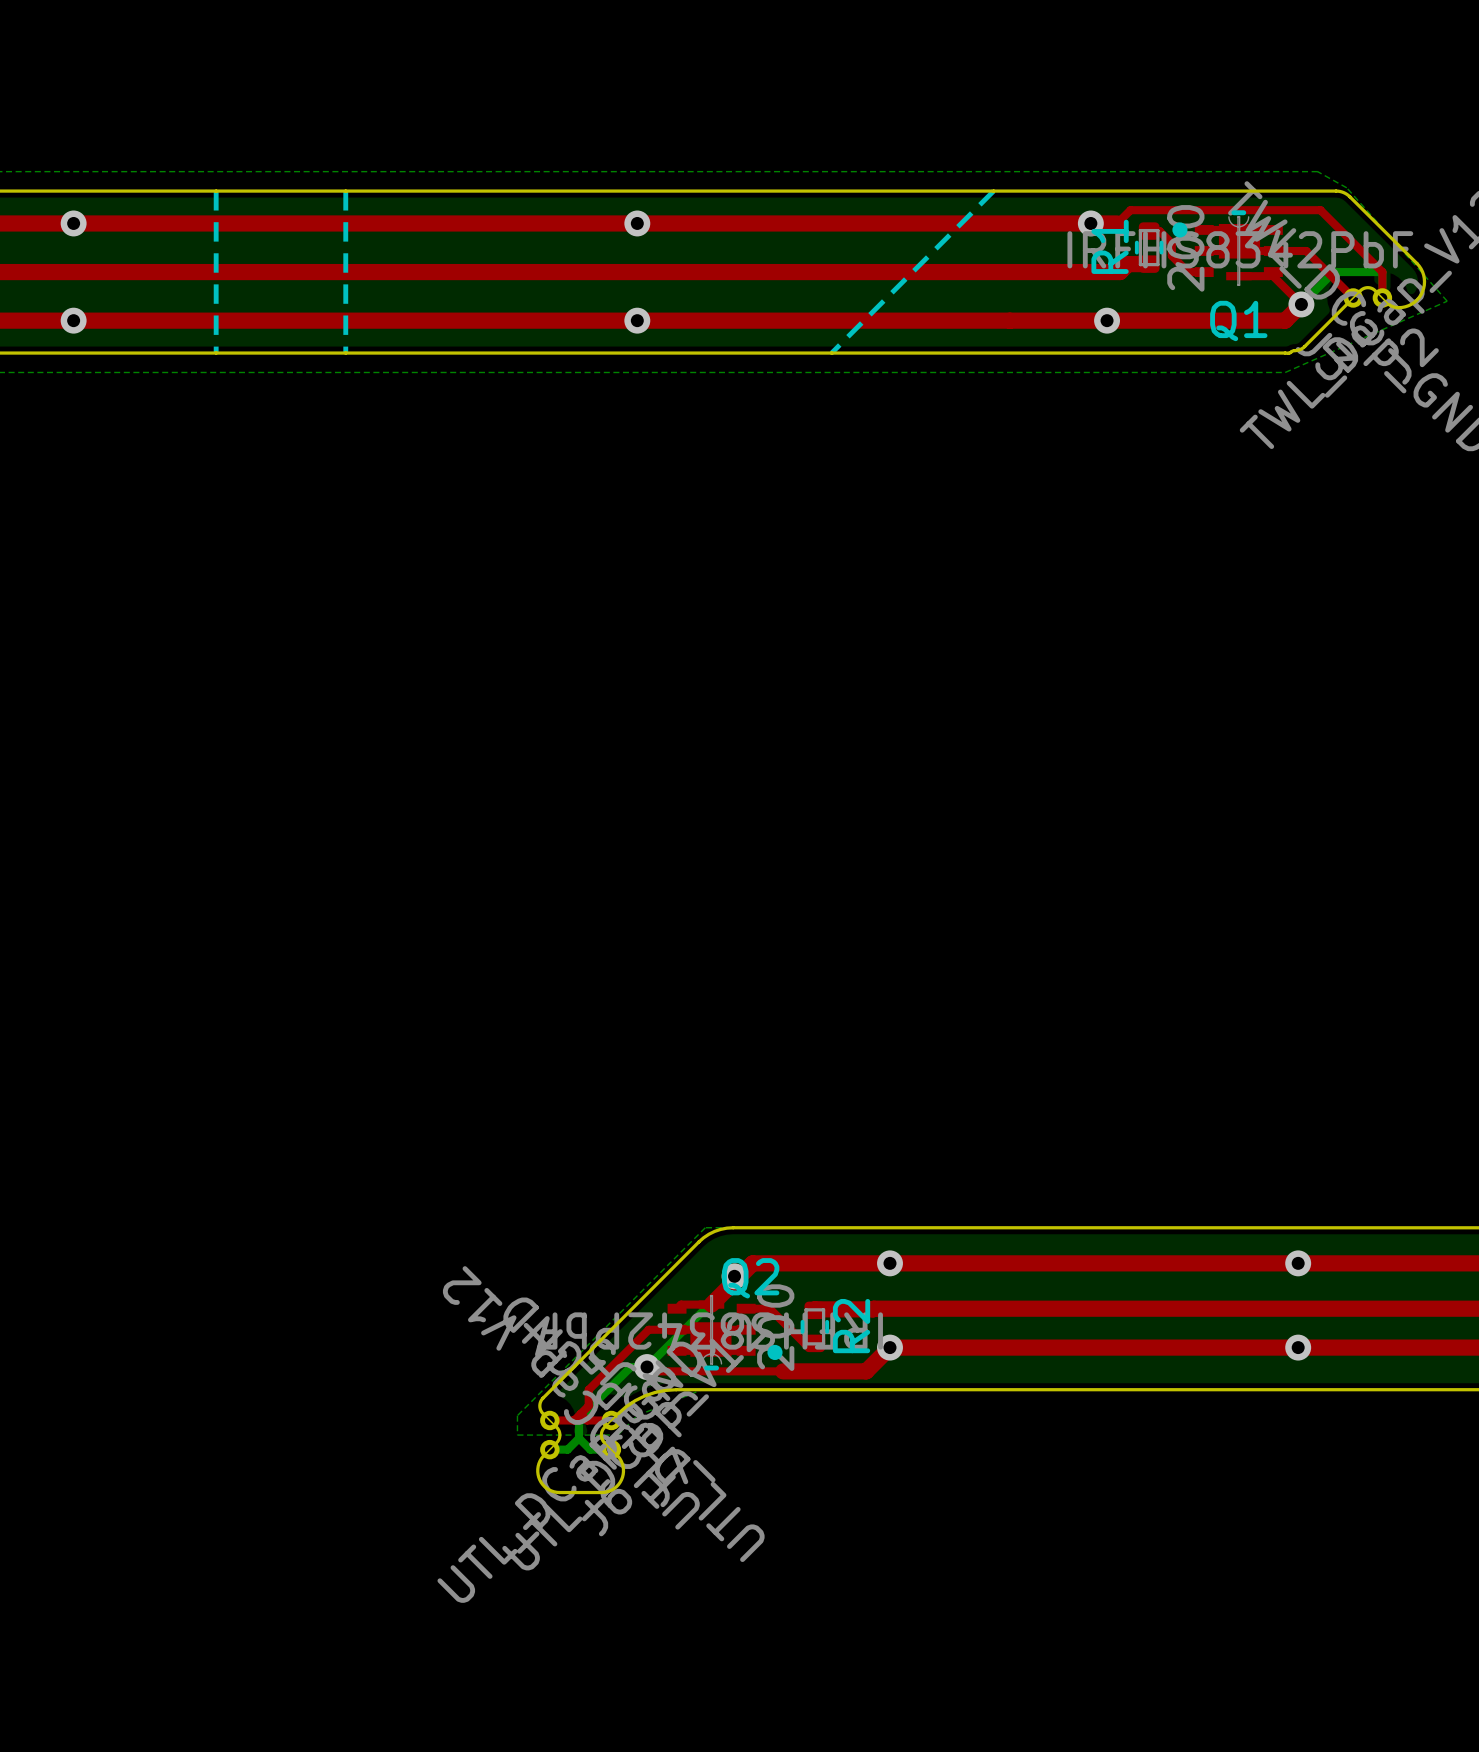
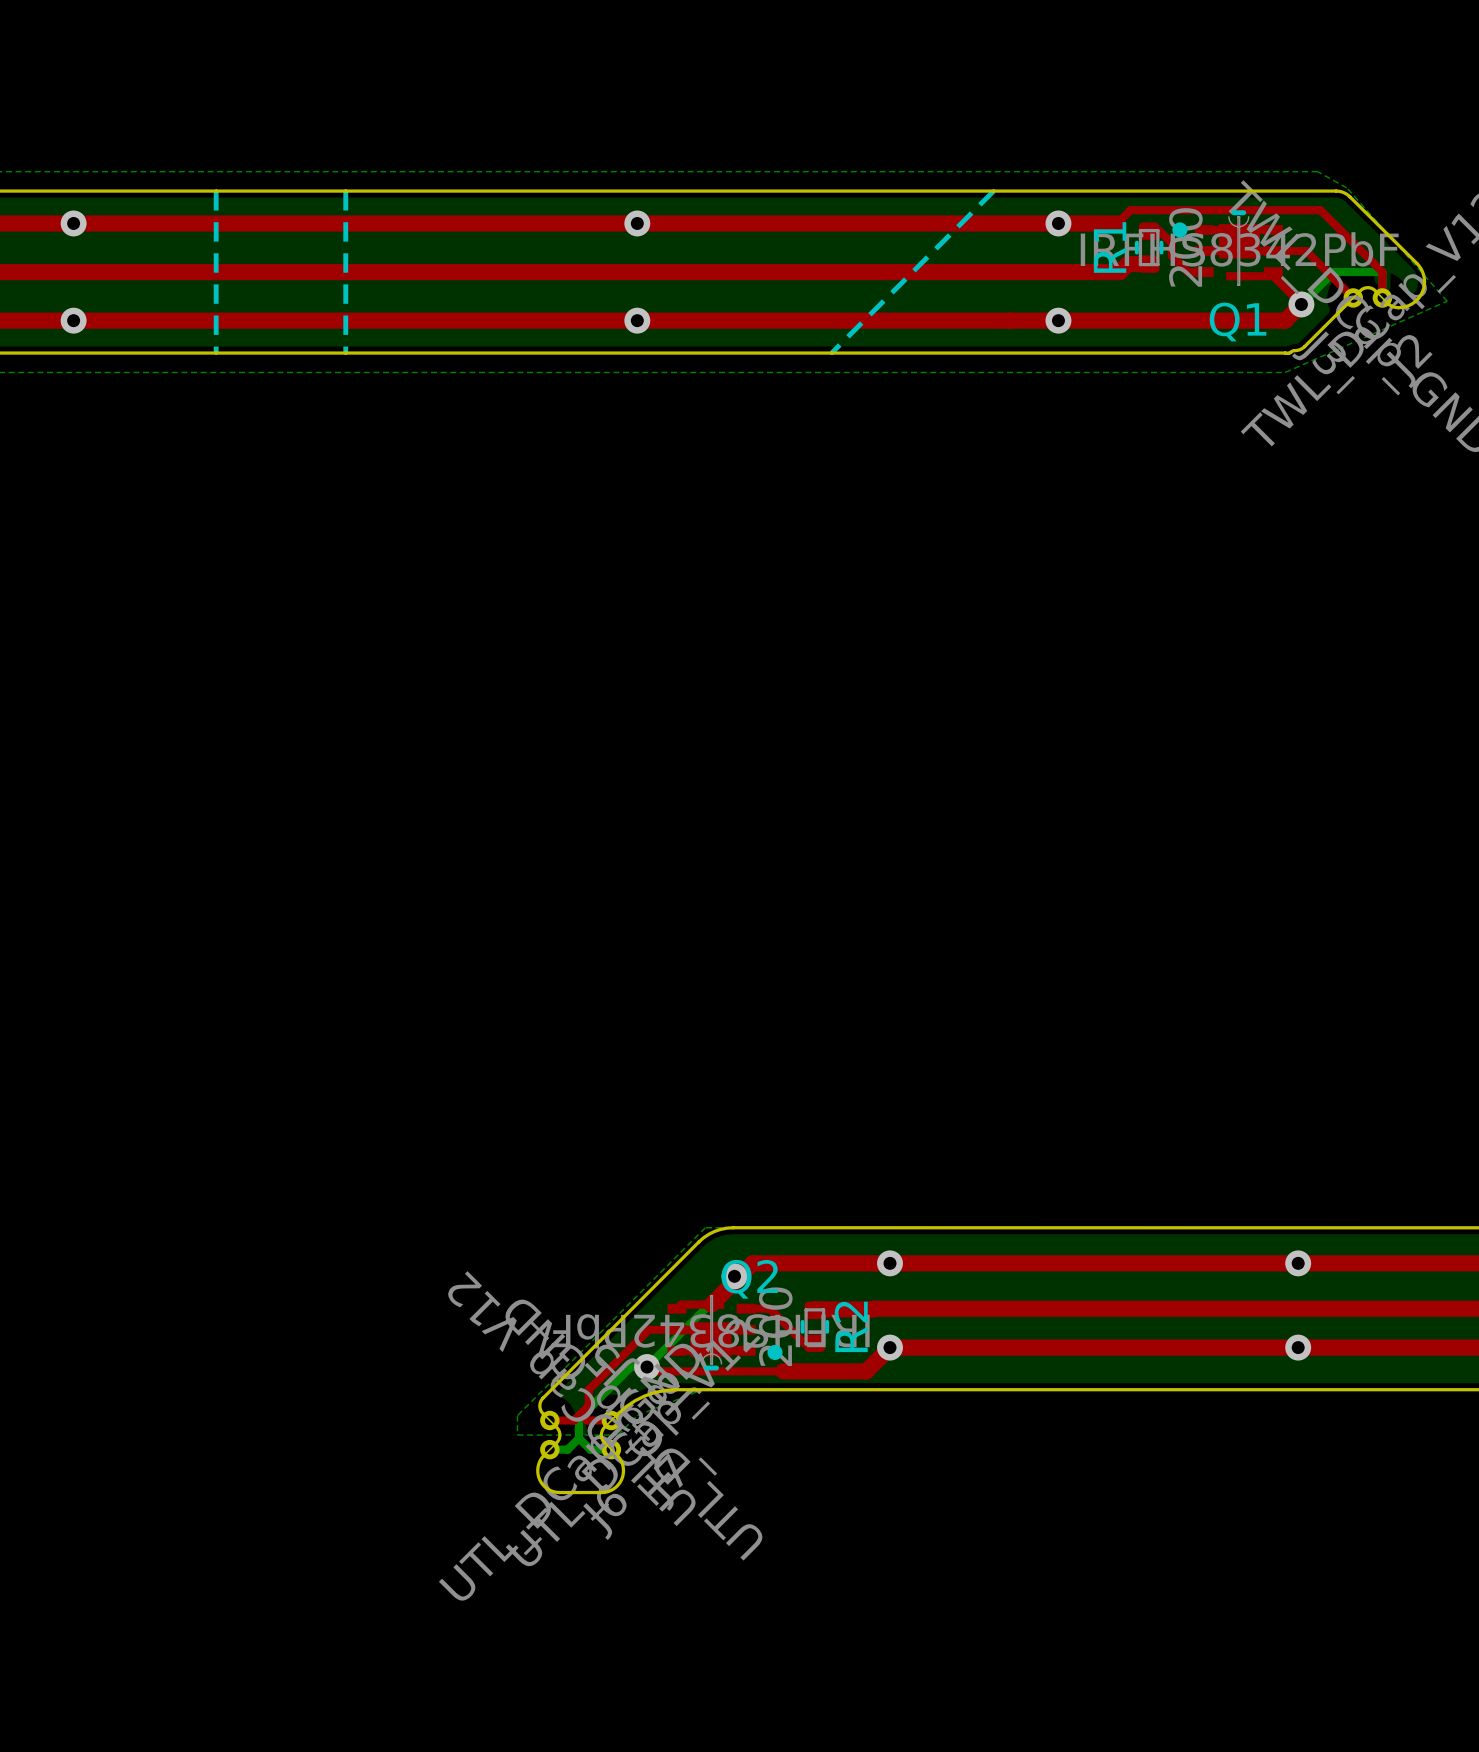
via position: (1090, 223) -> (1058, 223)
via position: (1107, 320) -> (1058, 320)

